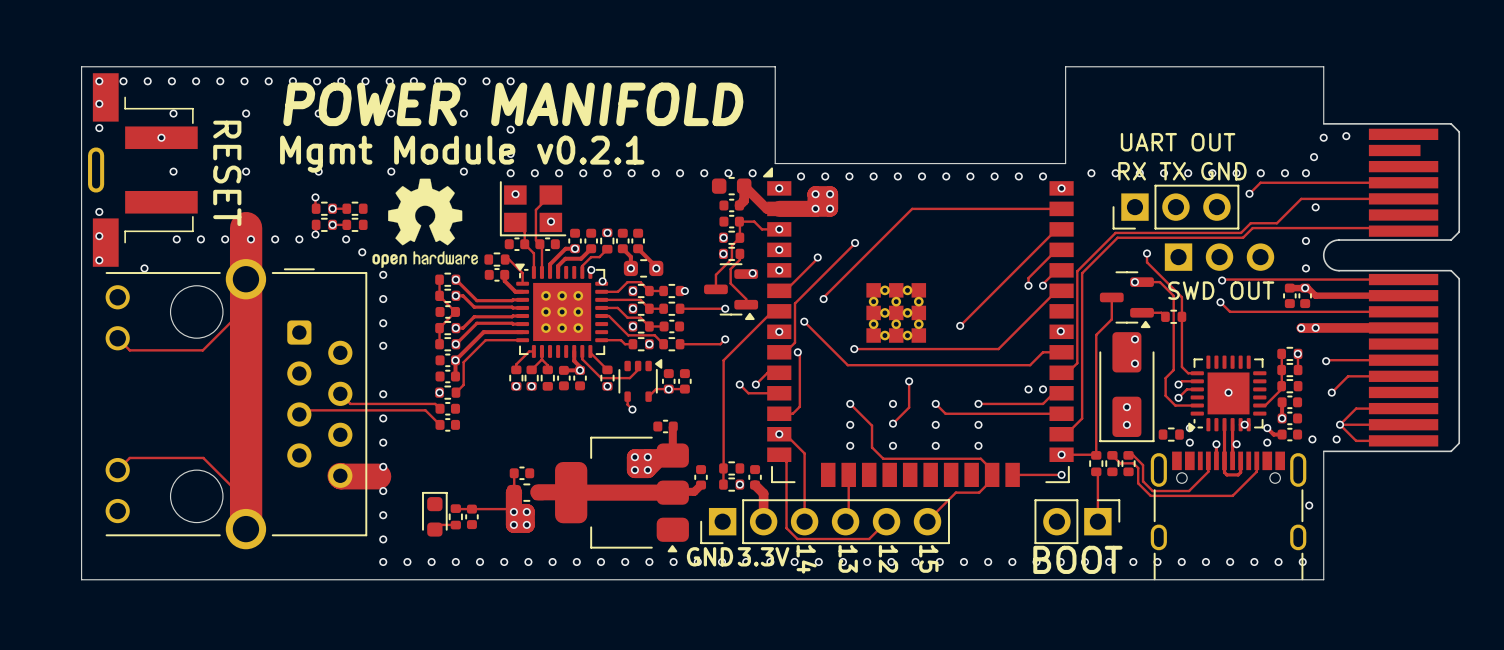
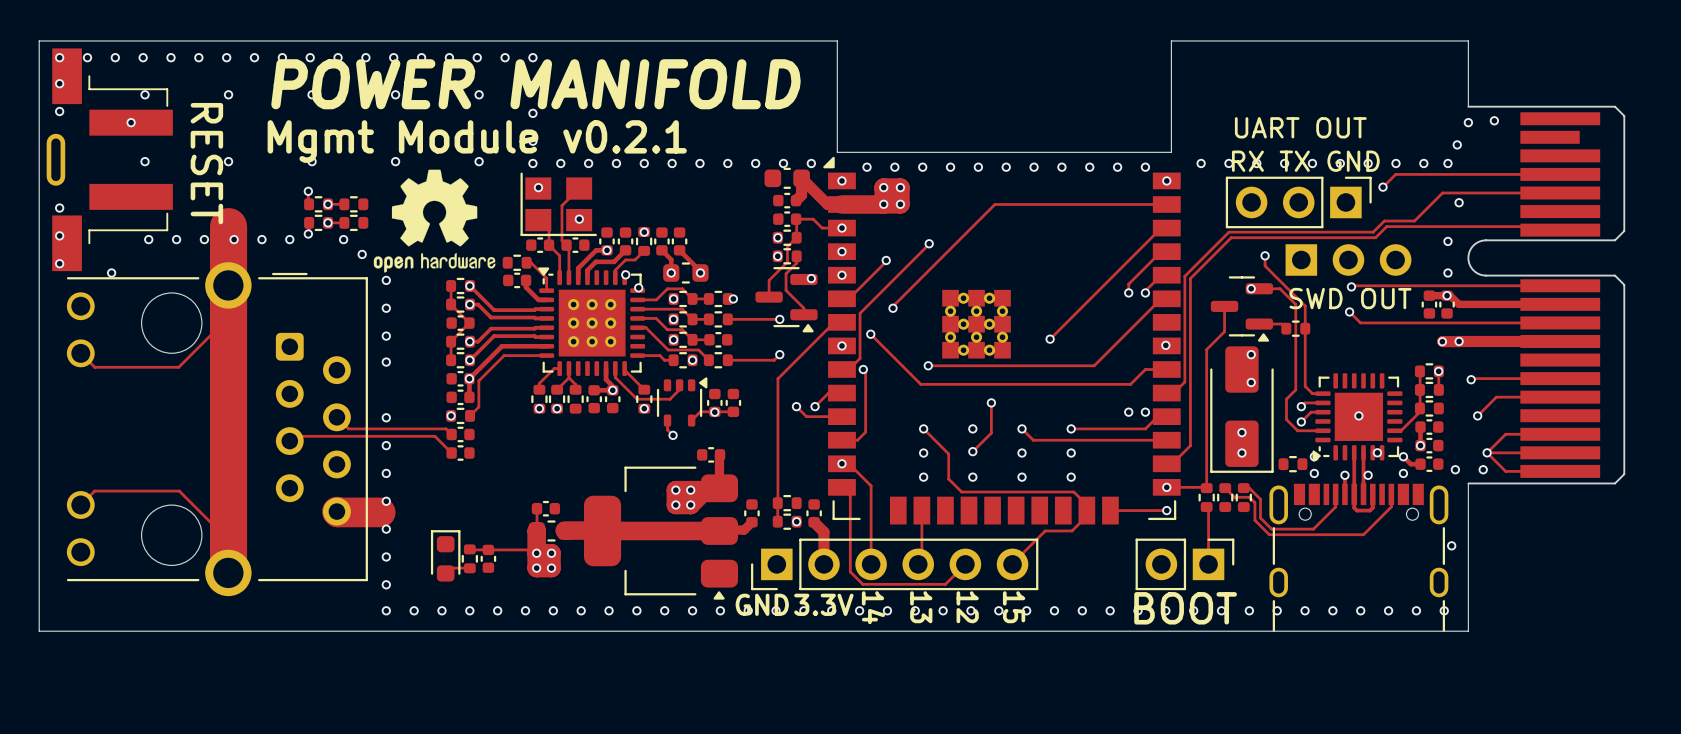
part rotation: 0° (1175, 207) -> 180° (1298, 202)

